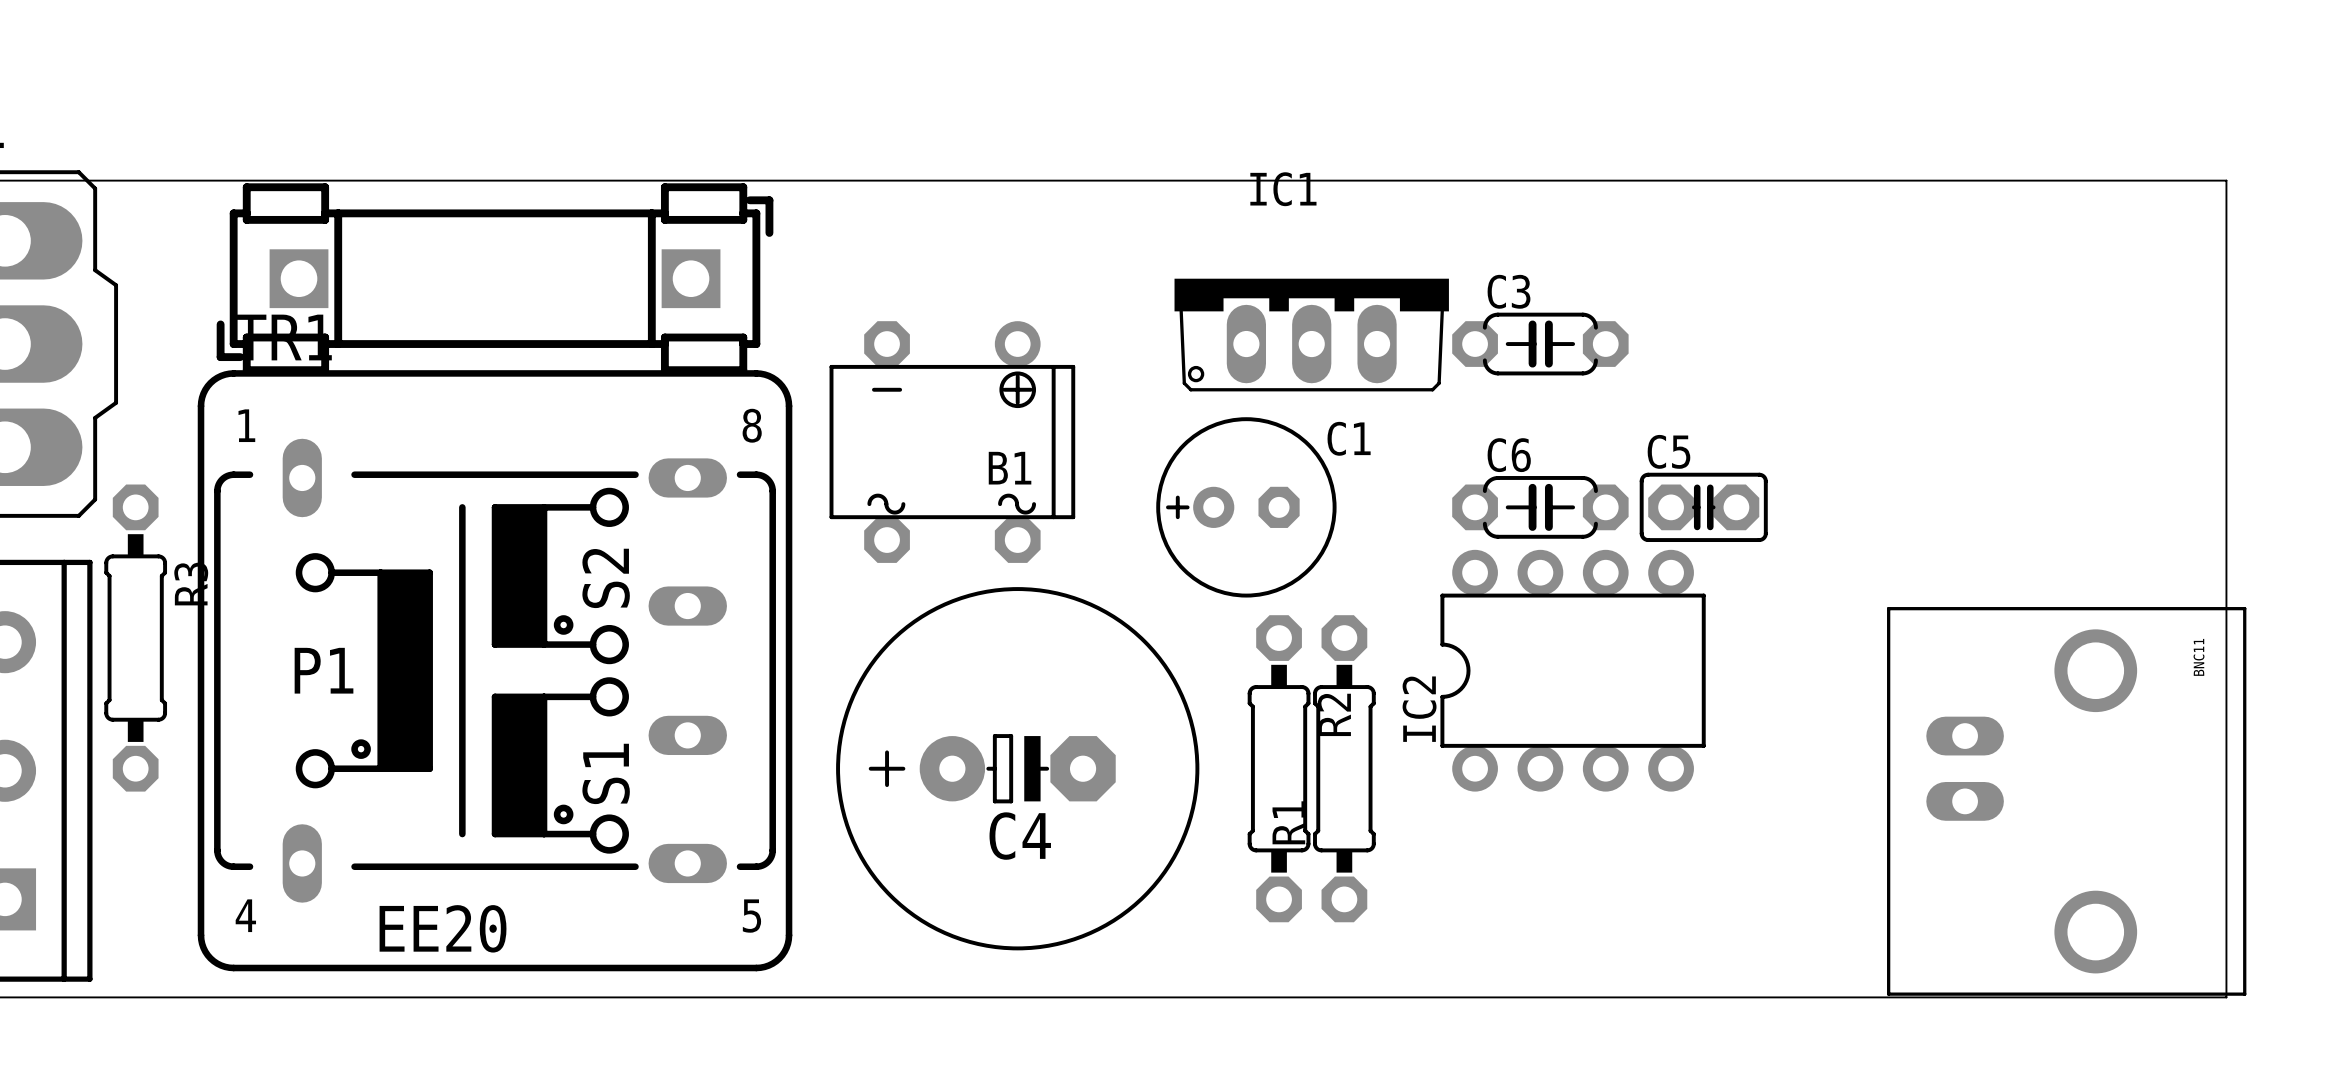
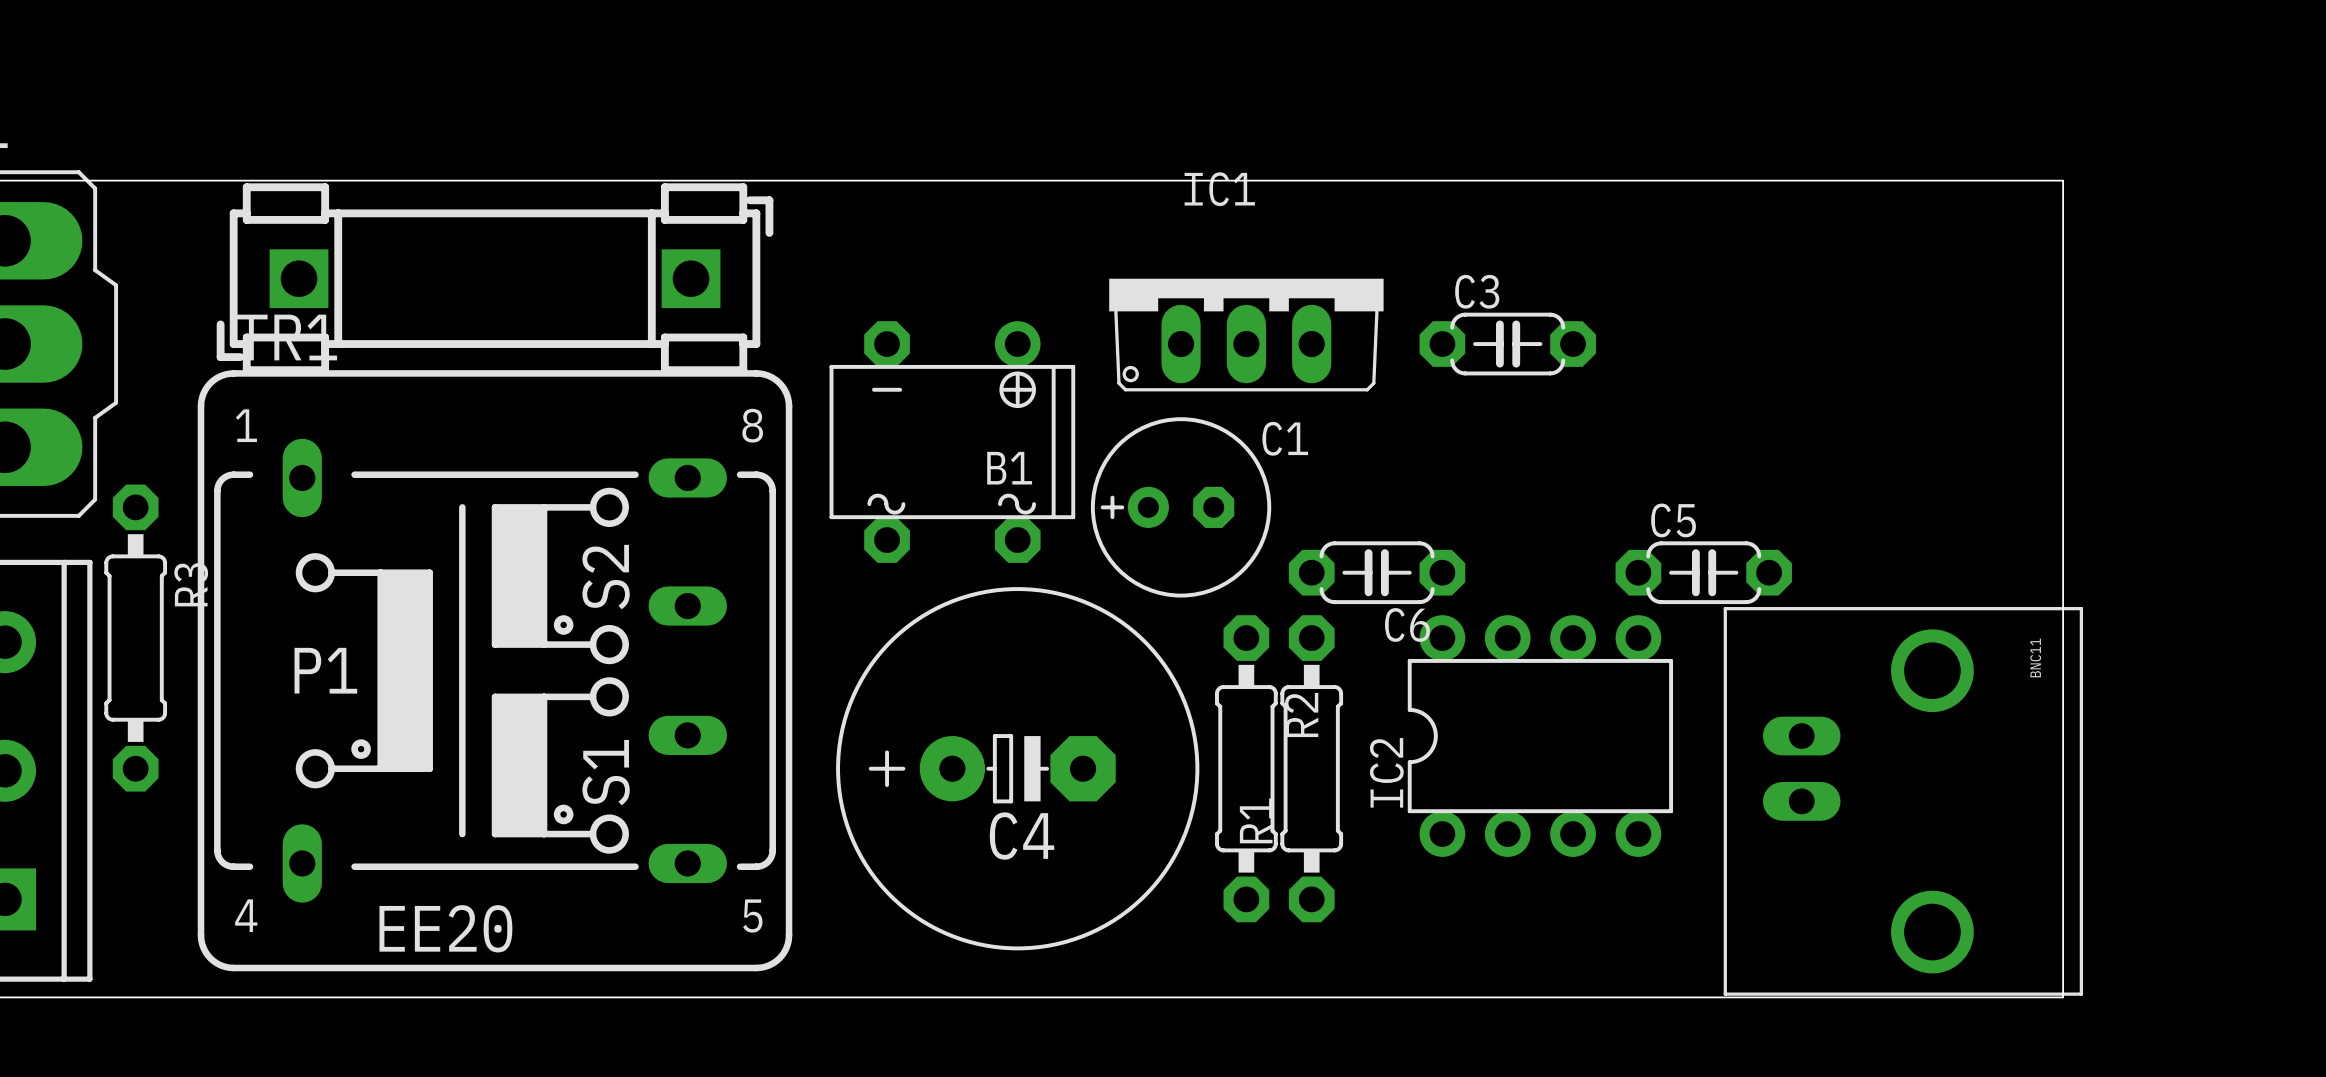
board edge: (2063, 180) (2226, 180) (2226, 997) (2063, 997) -> (2063, 180) (2063, 997)
IC1 position: (1311, 335) -> (1246, 335)
C3 position: (1540, 344) -> (1507, 344)
C5 footprint: [1639, 472, 1768, 543] -> [1615, 541, 1792, 605]
C1 position: (1246, 507) -> (1181, 507)
C6 rotation: 0° (1540, 507) -> 180° (1377, 572)
C6 position: (1540, 507) -> (1377, 572)
IC2 position: (1573, 670) -> (1540, 736)
R2 position: (1279, 768) -> (1246, 768)
R1 position: (1344, 768) -> (1311, 768)
BNC11 position: (2066, 801) -> (1903, 801)

